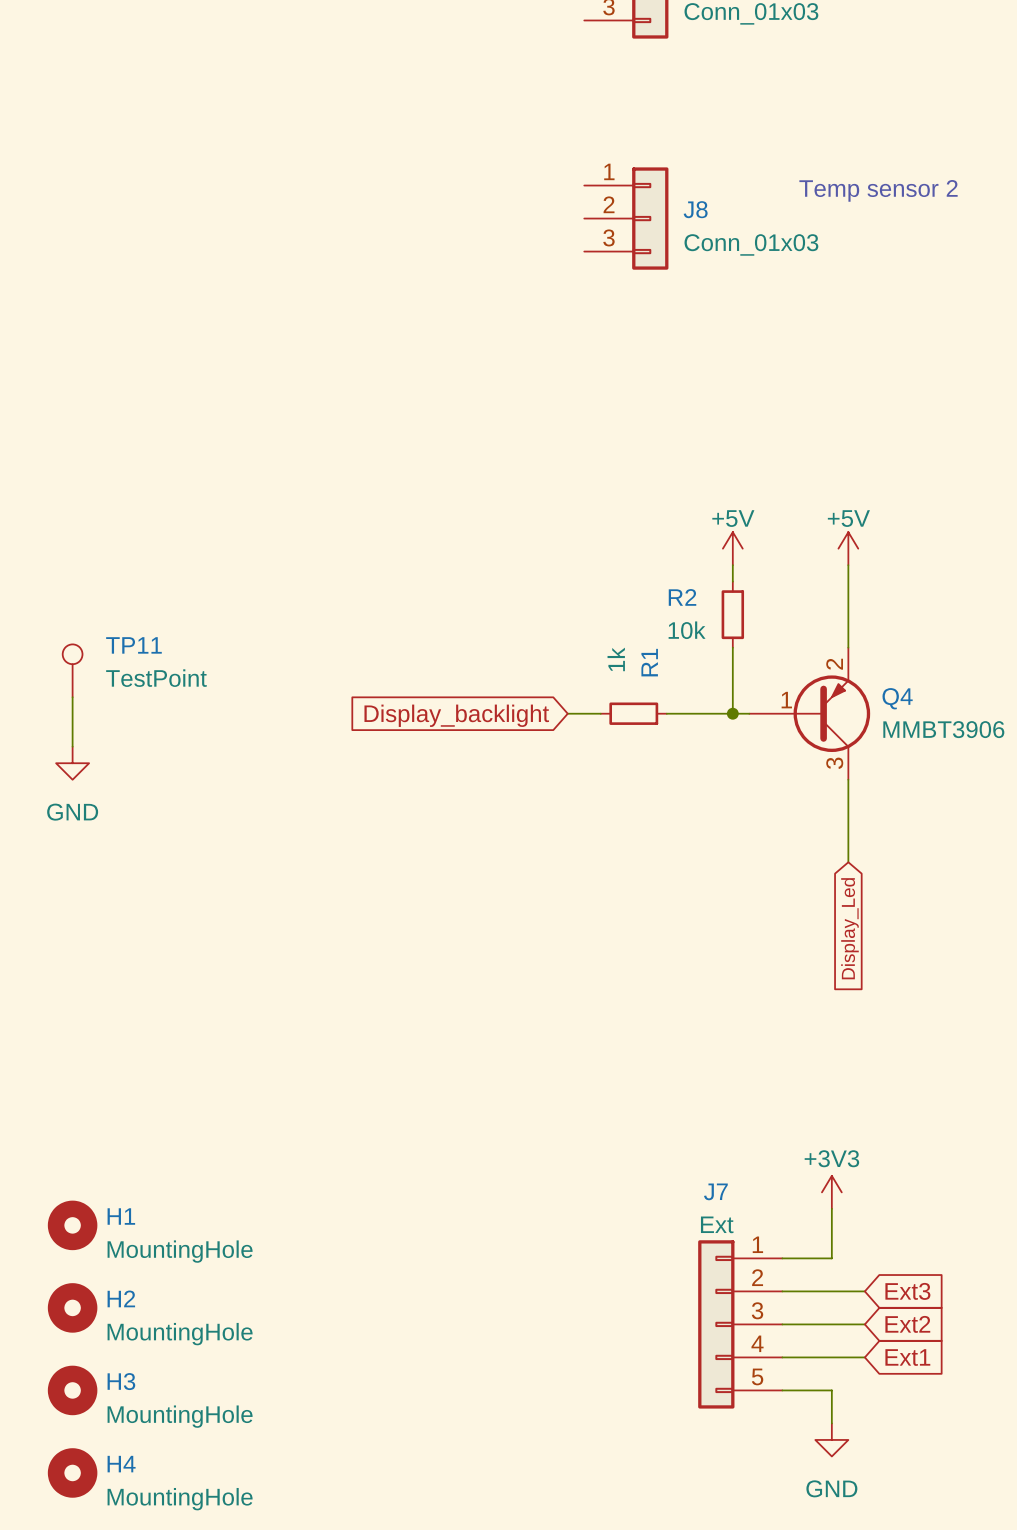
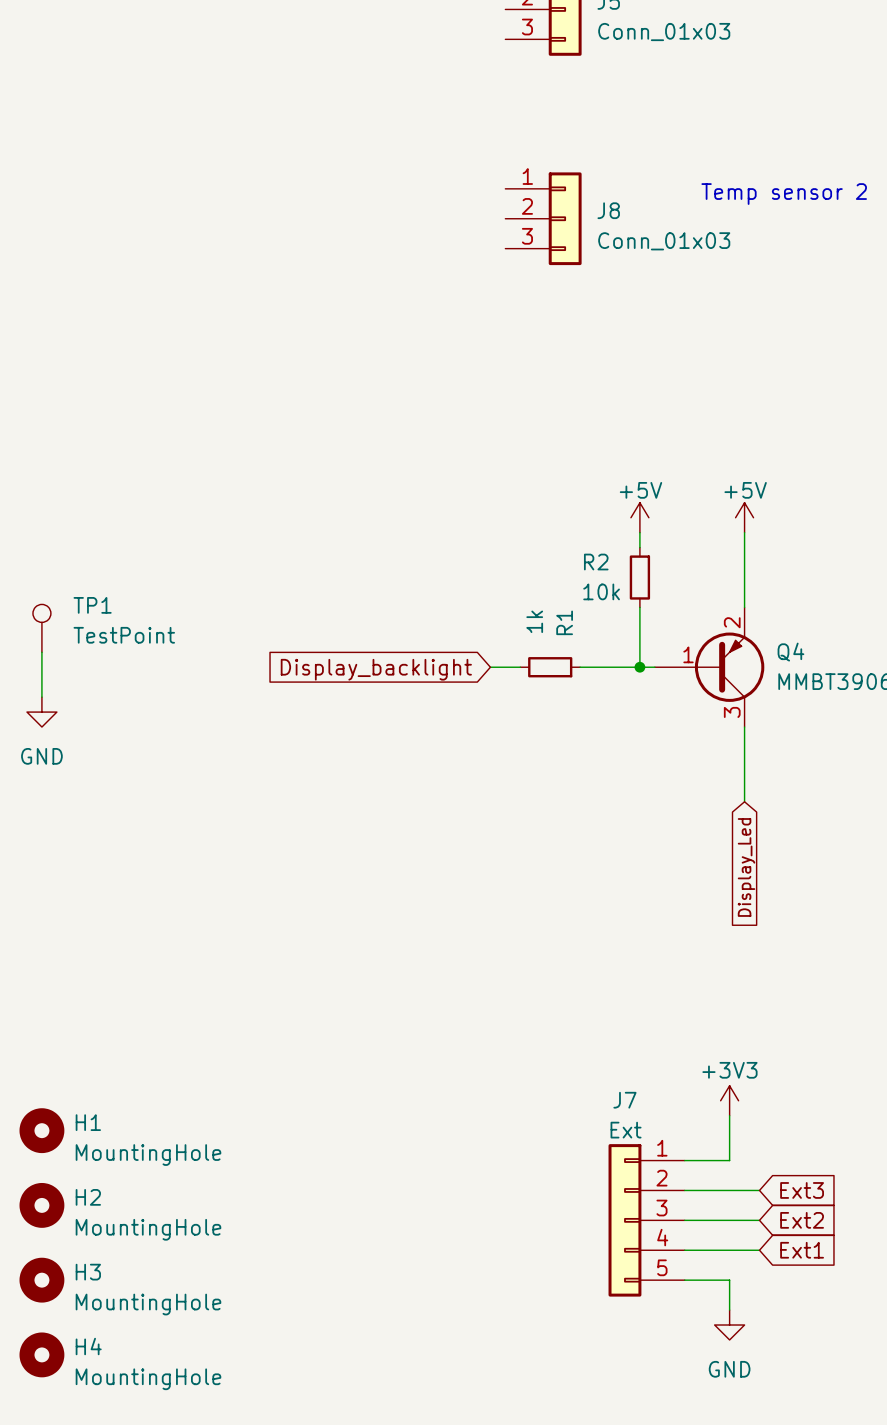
TP11 name: TP11 (133, 645) -> TP1 (92, 605)

